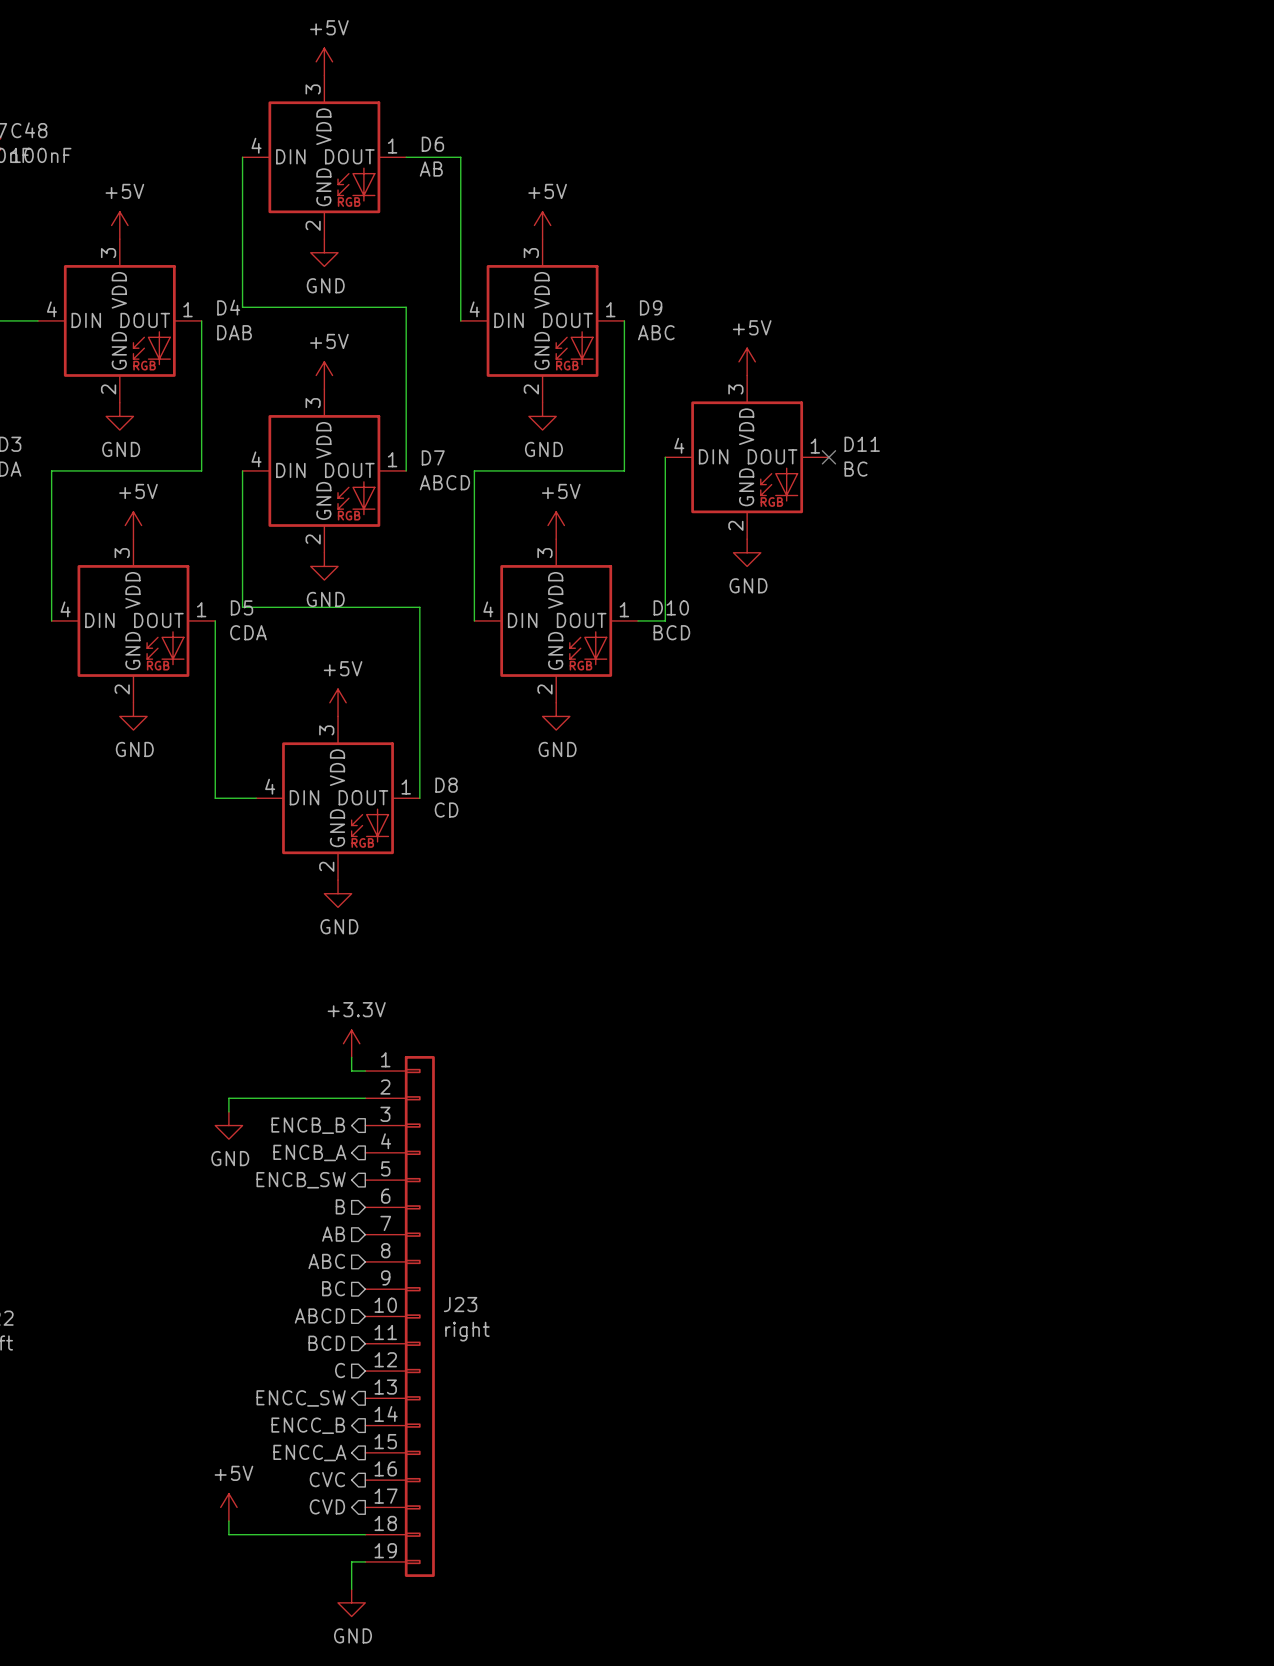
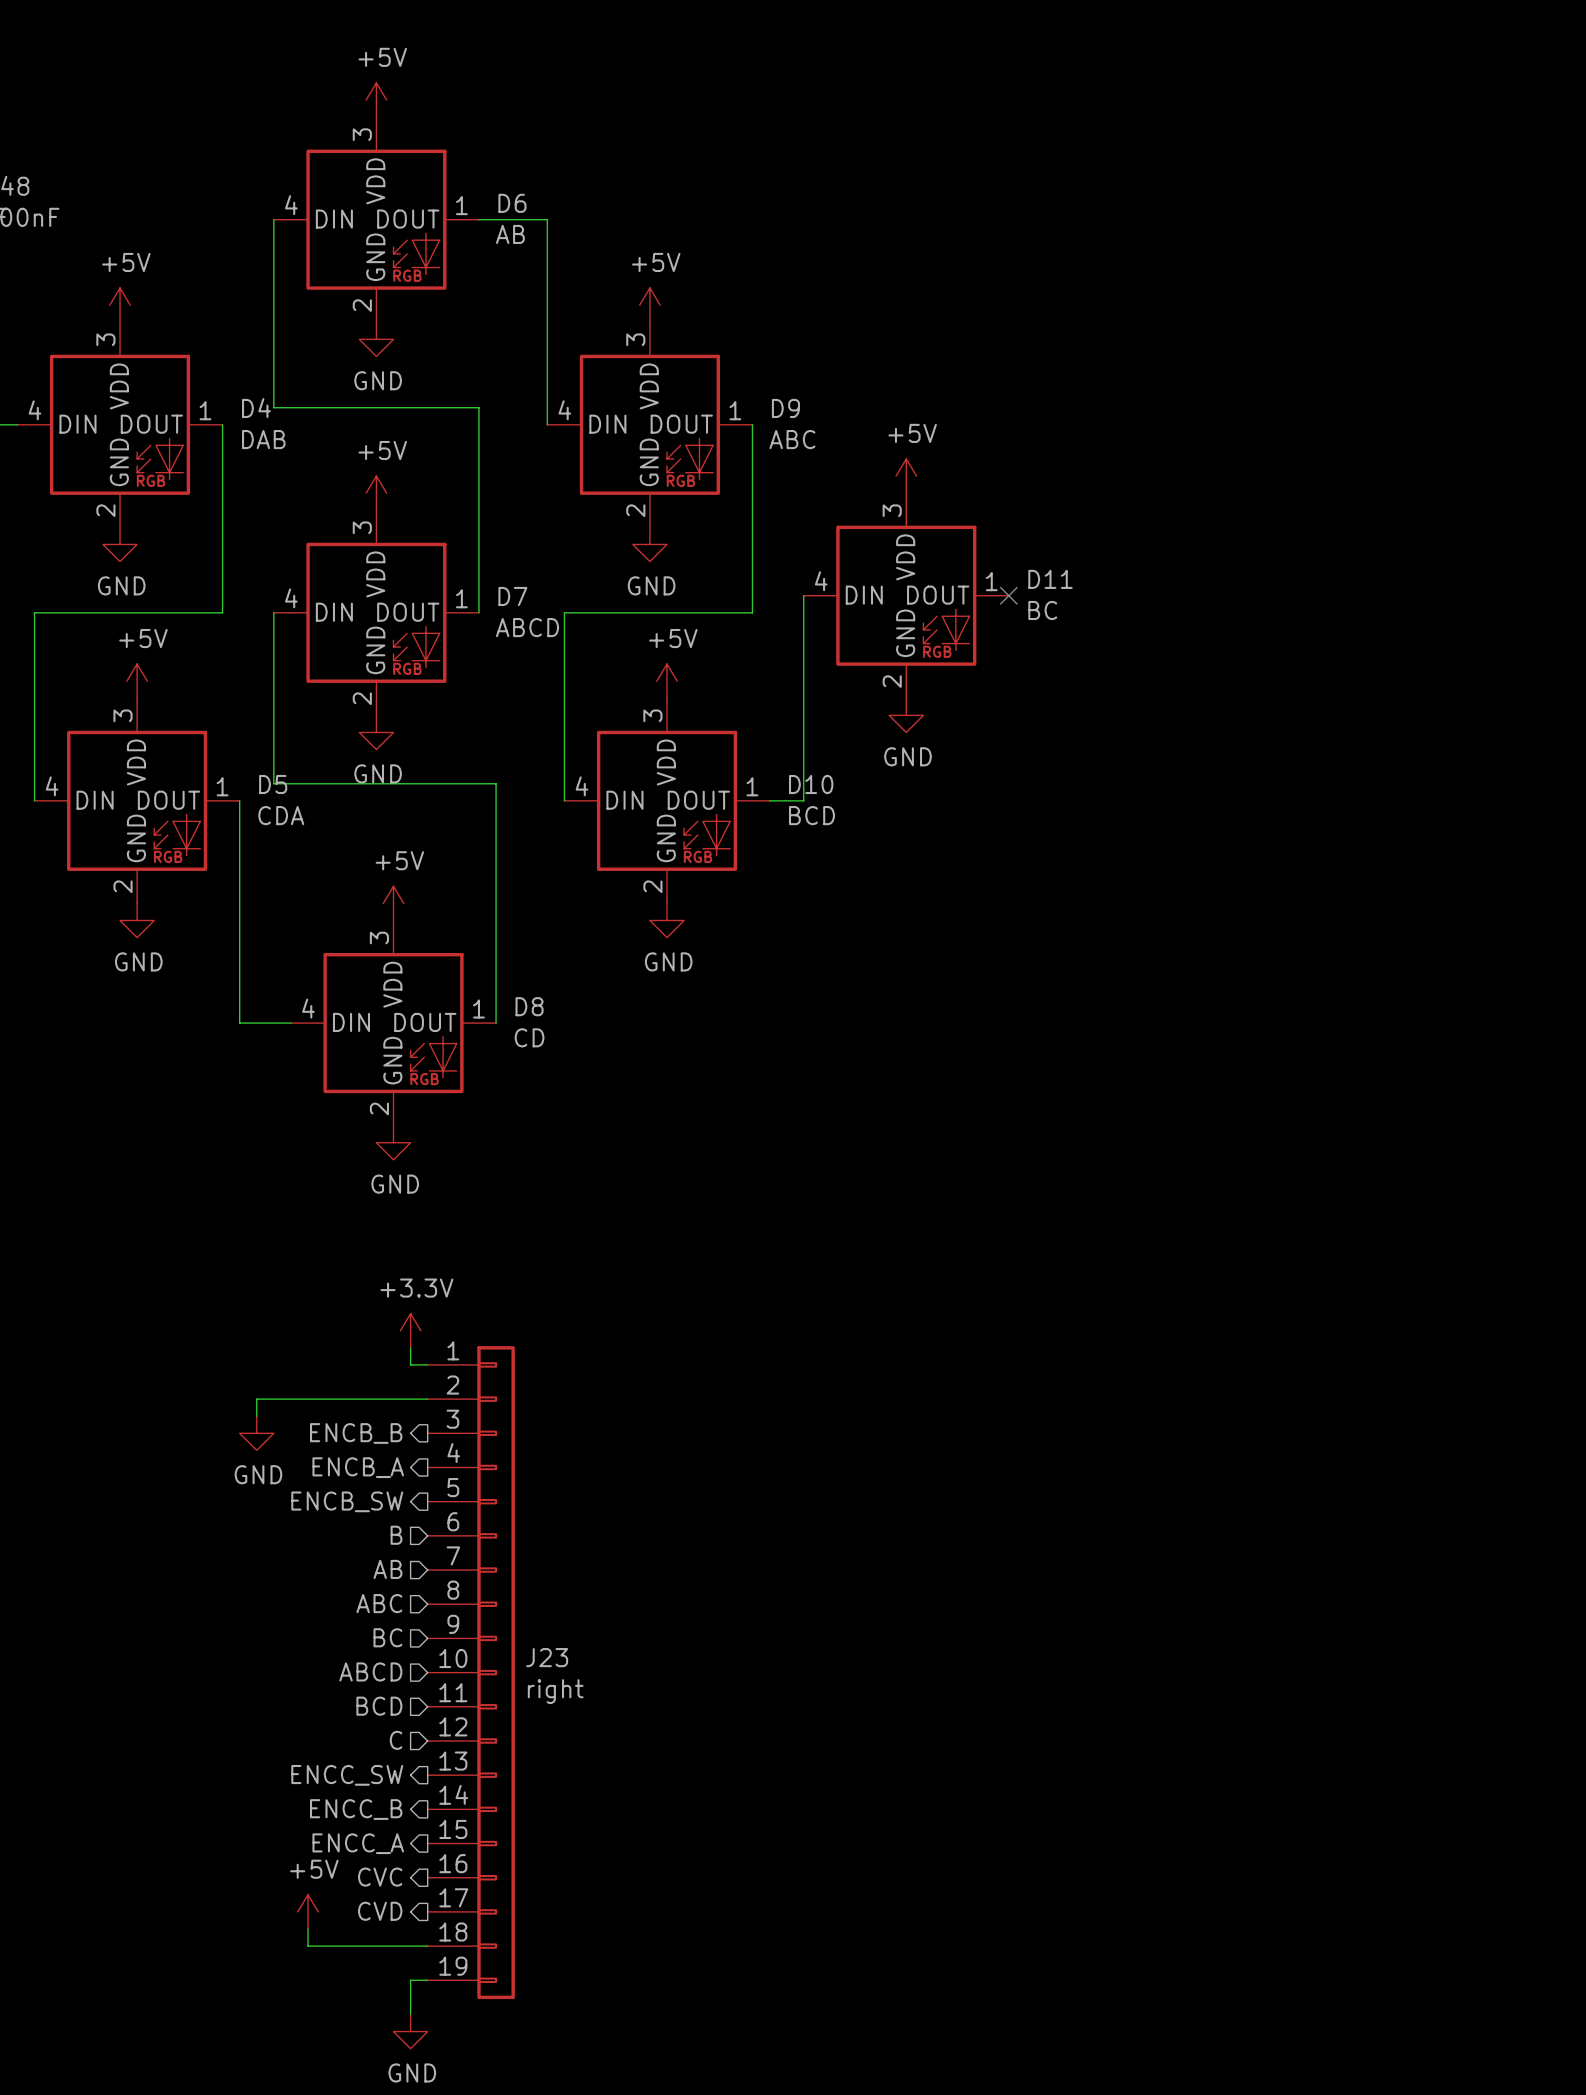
power symbol position: +5V (228, 1507) -> +5V (308, 1911)
wire: (228, 1521) (228, 1534) (269, 1534) -> (308, 1929) (308, 1946)

